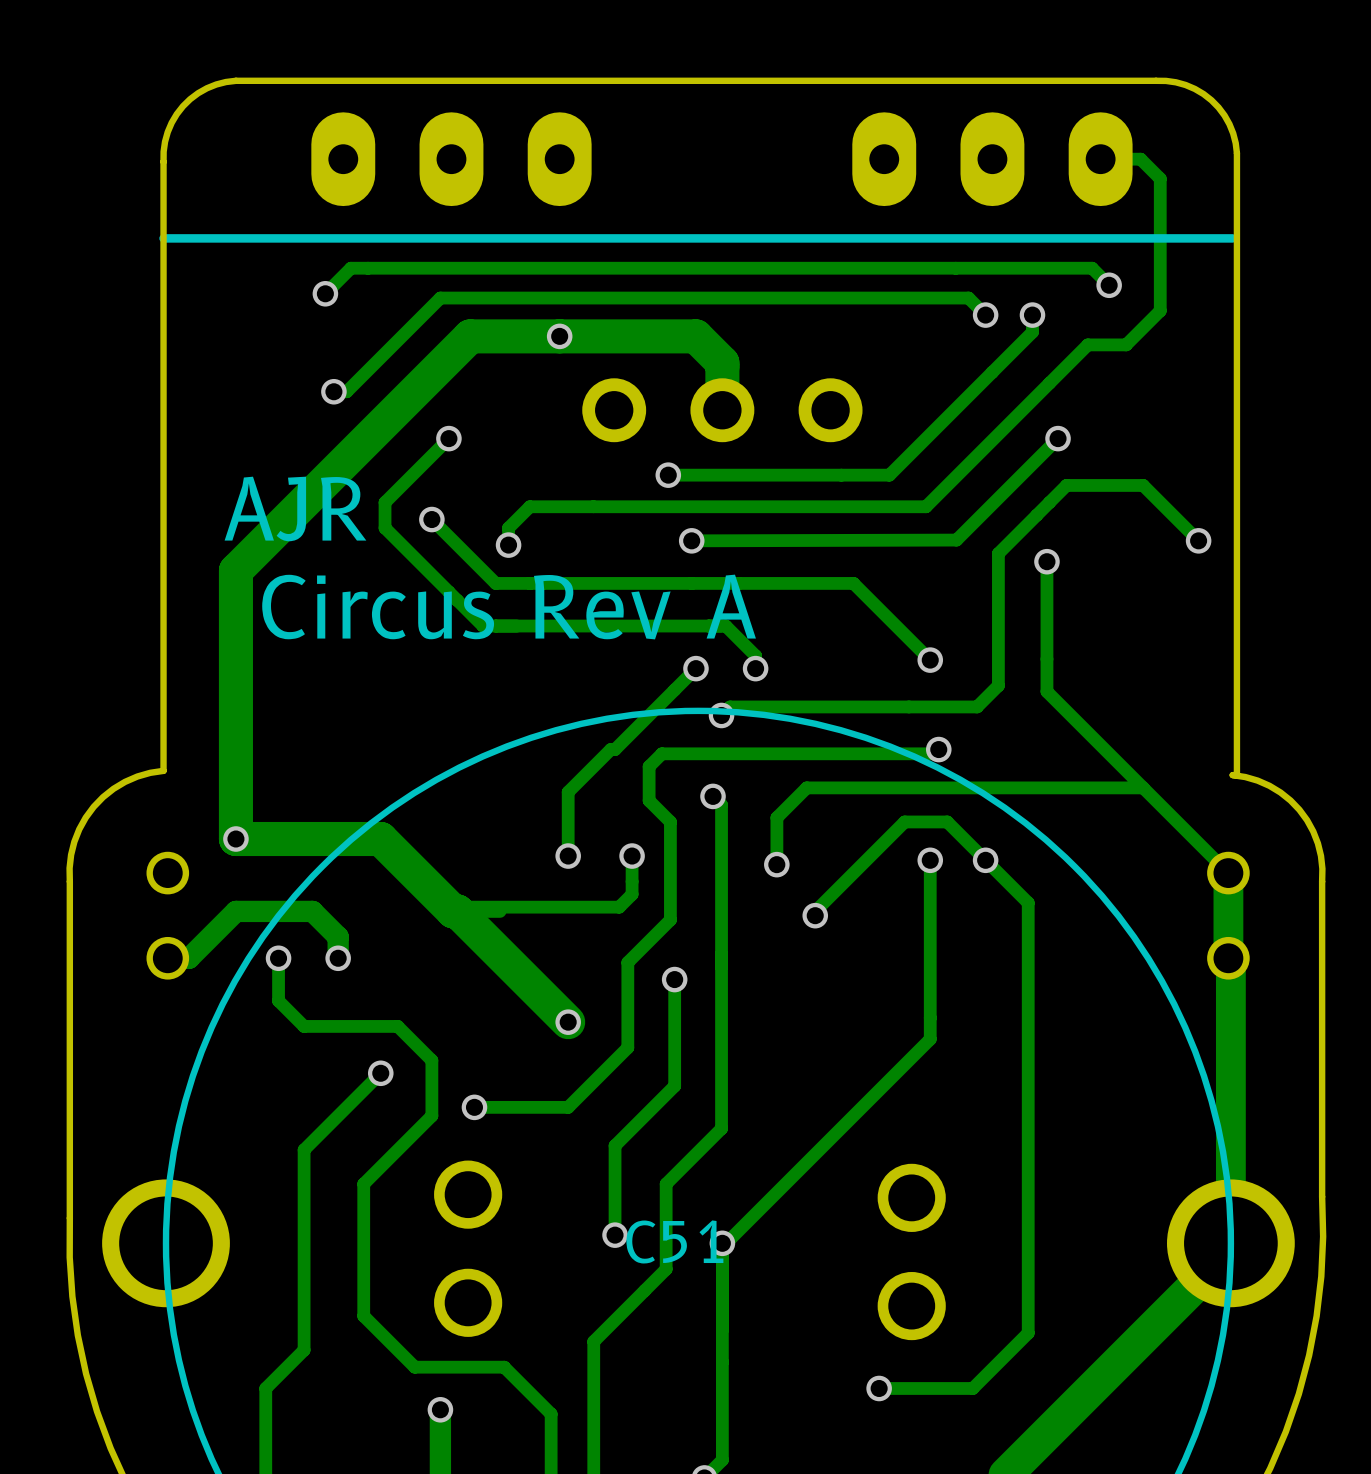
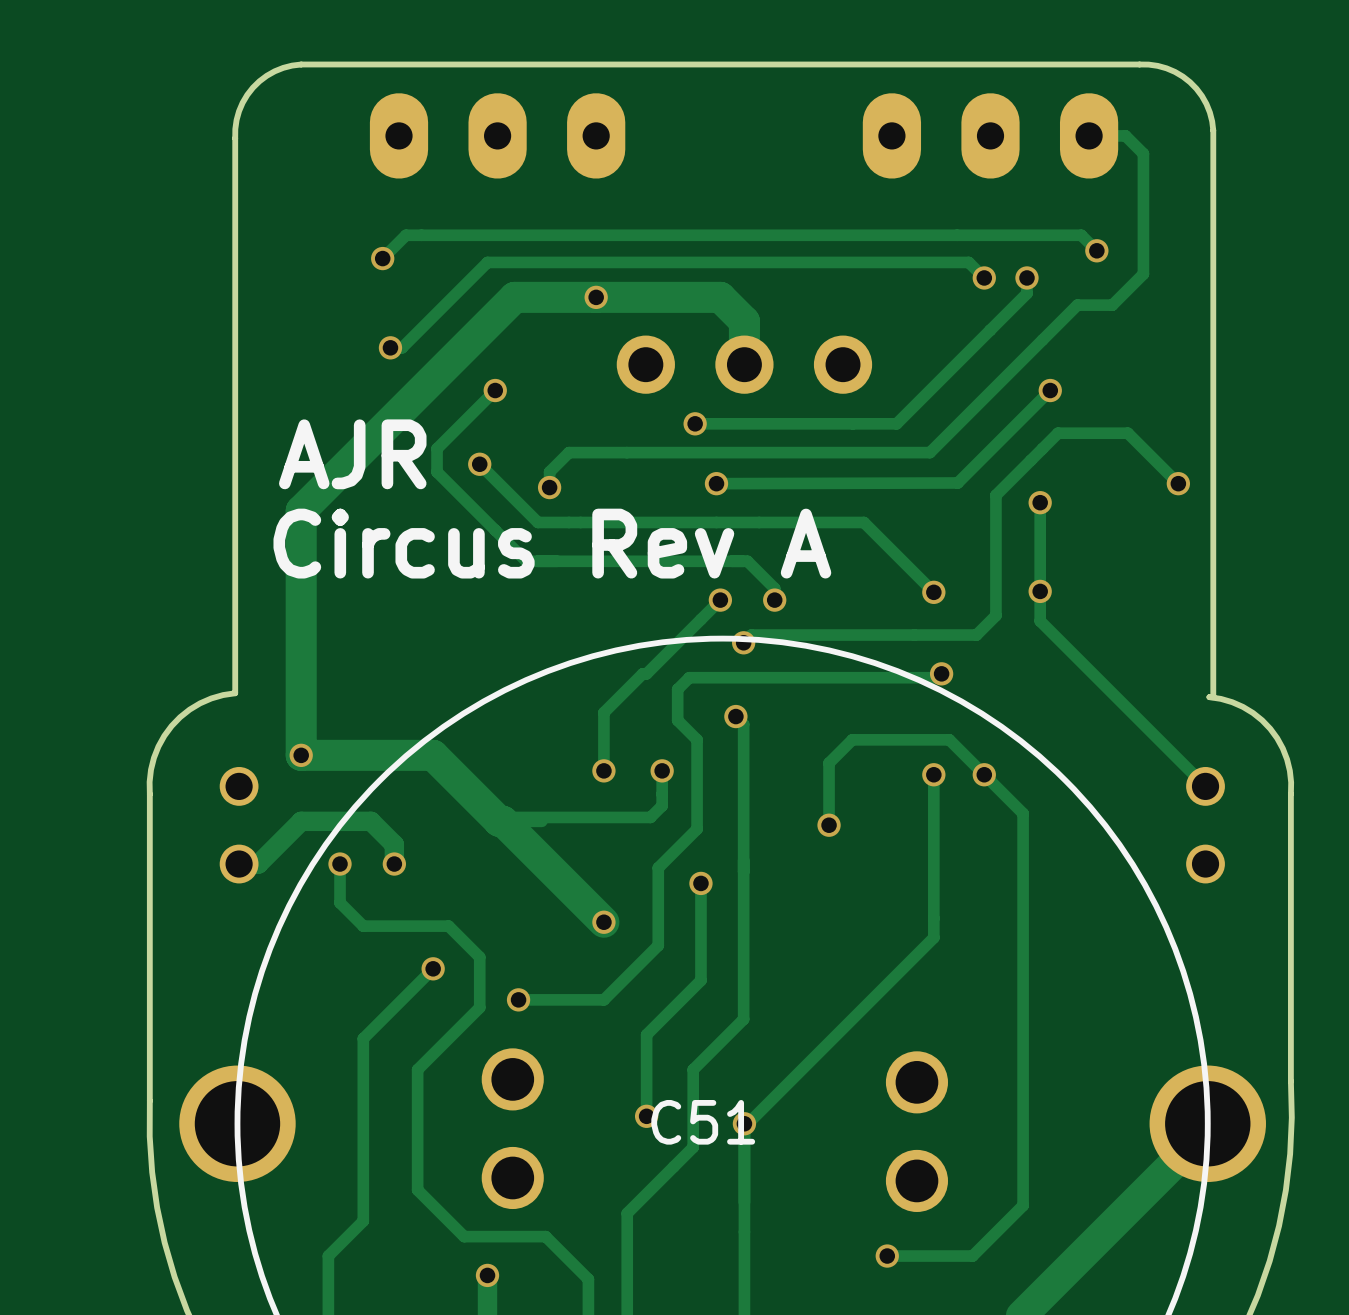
line: (1232, 238) (163, 238) -> none
via: none -> (1040, 591)
track: (1143, 787) (806, 787) (776, 817) (776, 864) -> none
track: (904, 821) (815, 911) -> (910, 739) (852, 739) (829, 763) (829, 821)
via: (776, 864) -> none
track: (1228, 873) (1228, 958) (1230, 960) (1230, 1243) -> none

